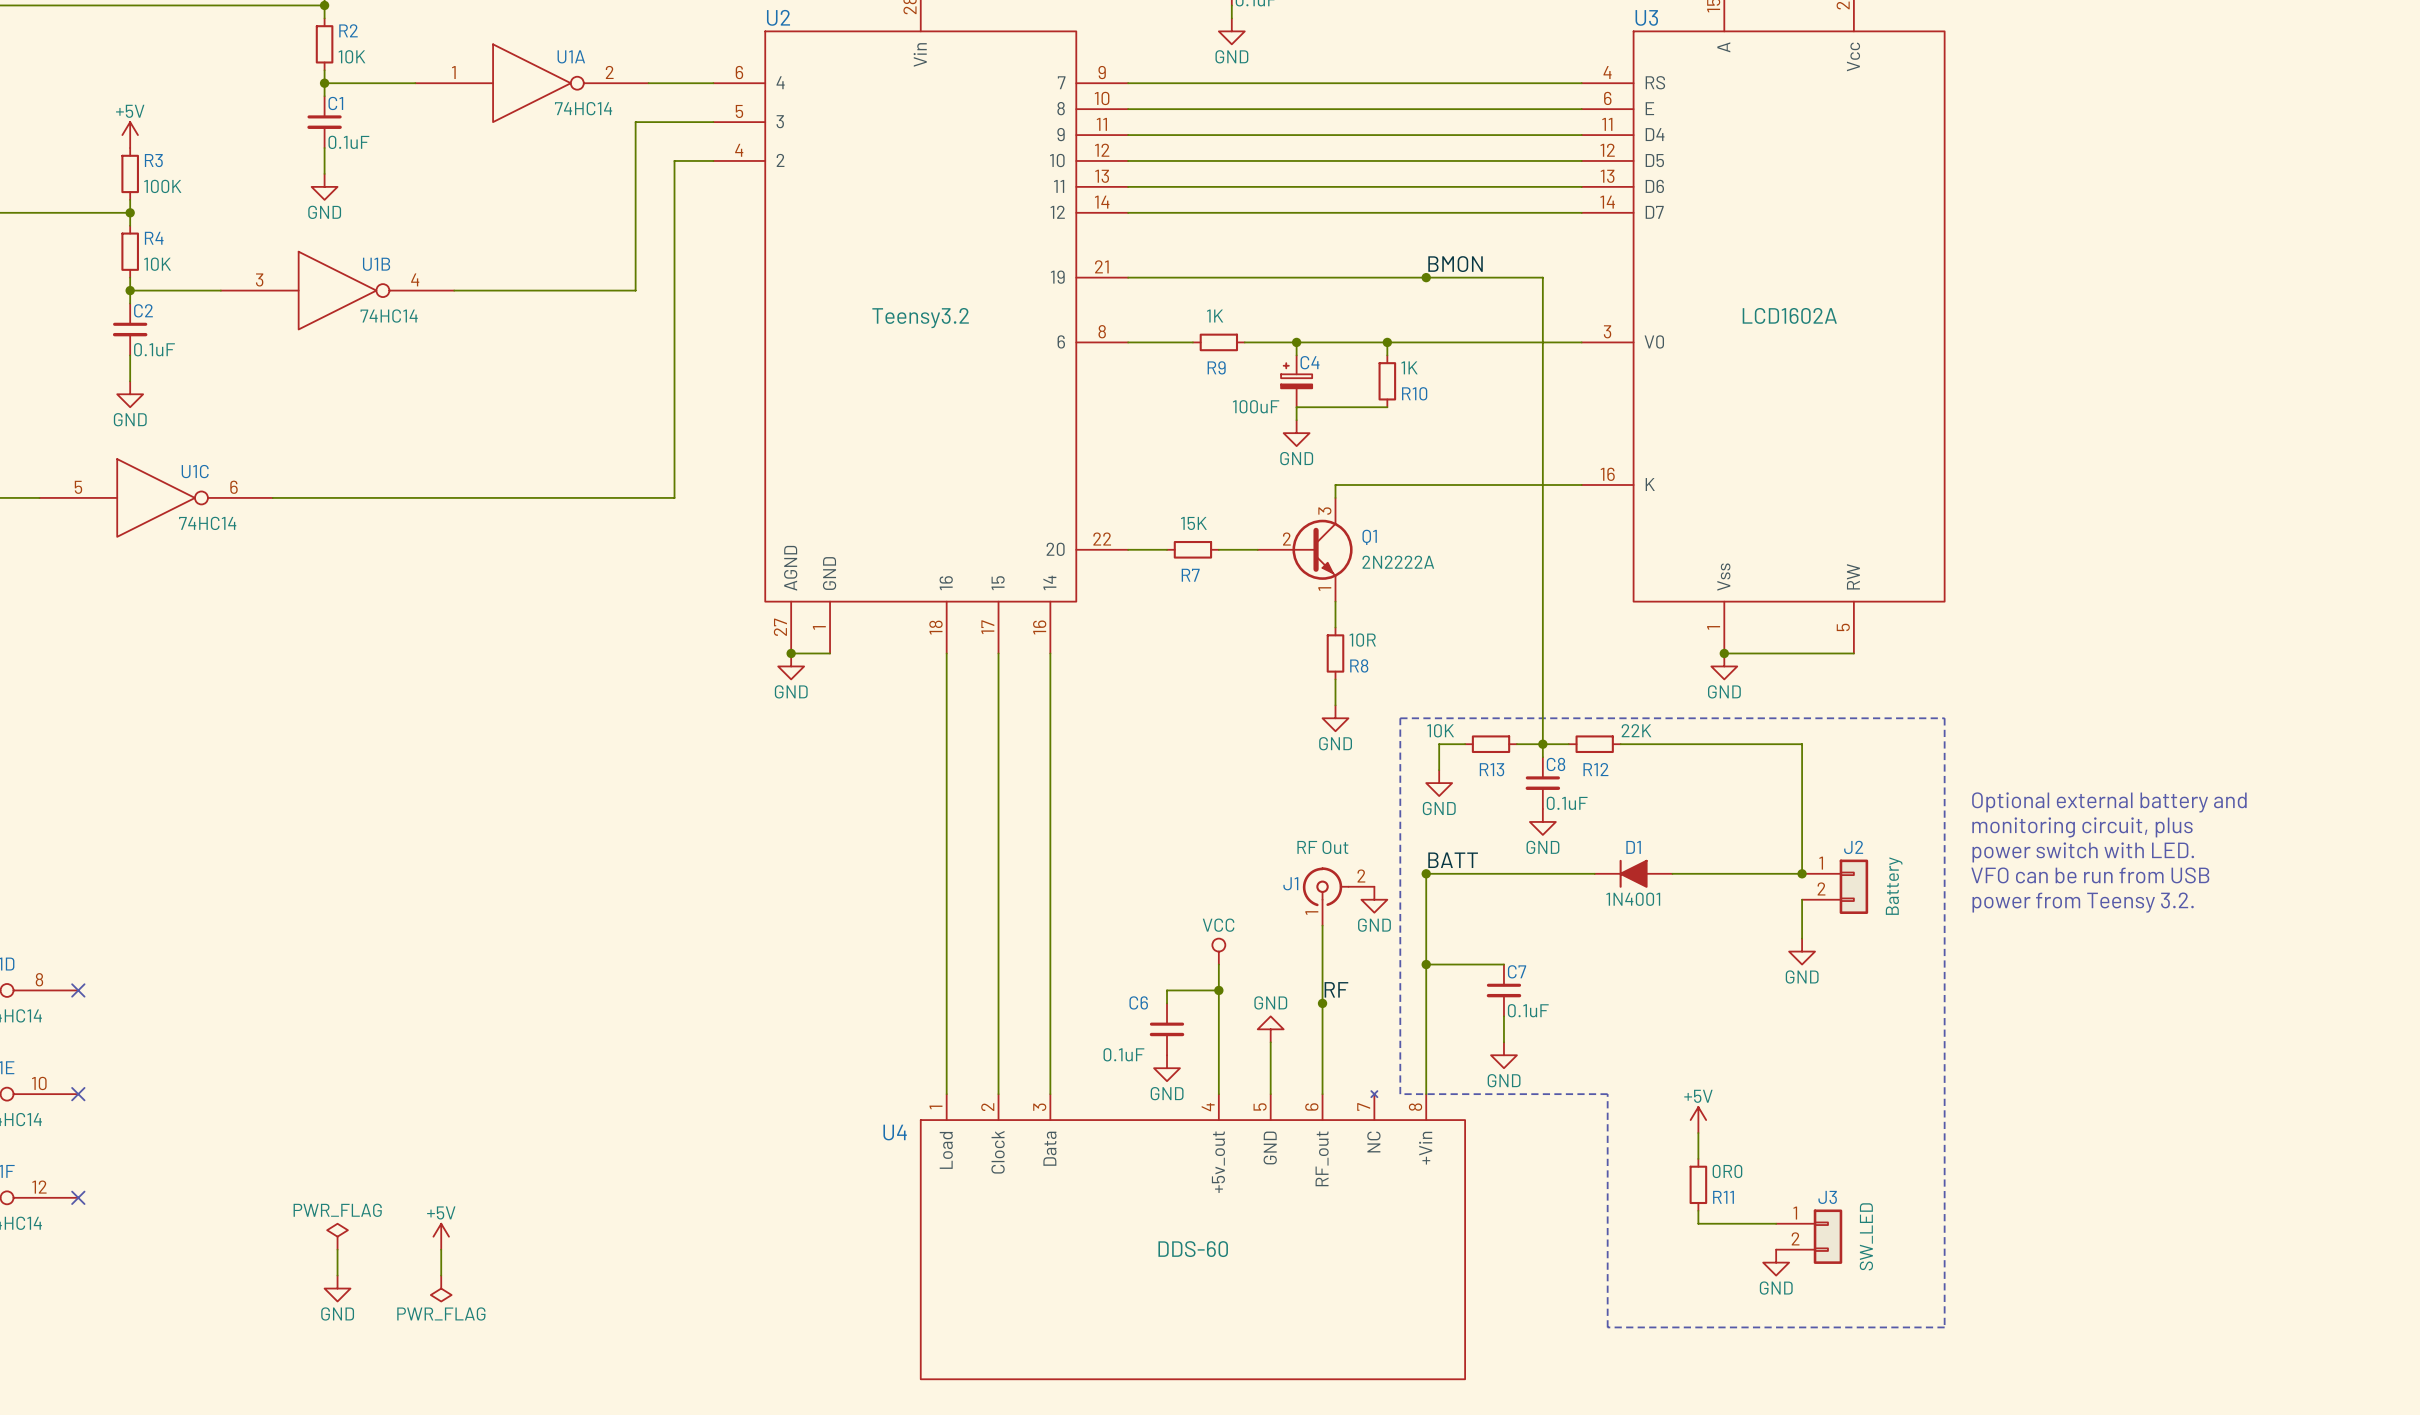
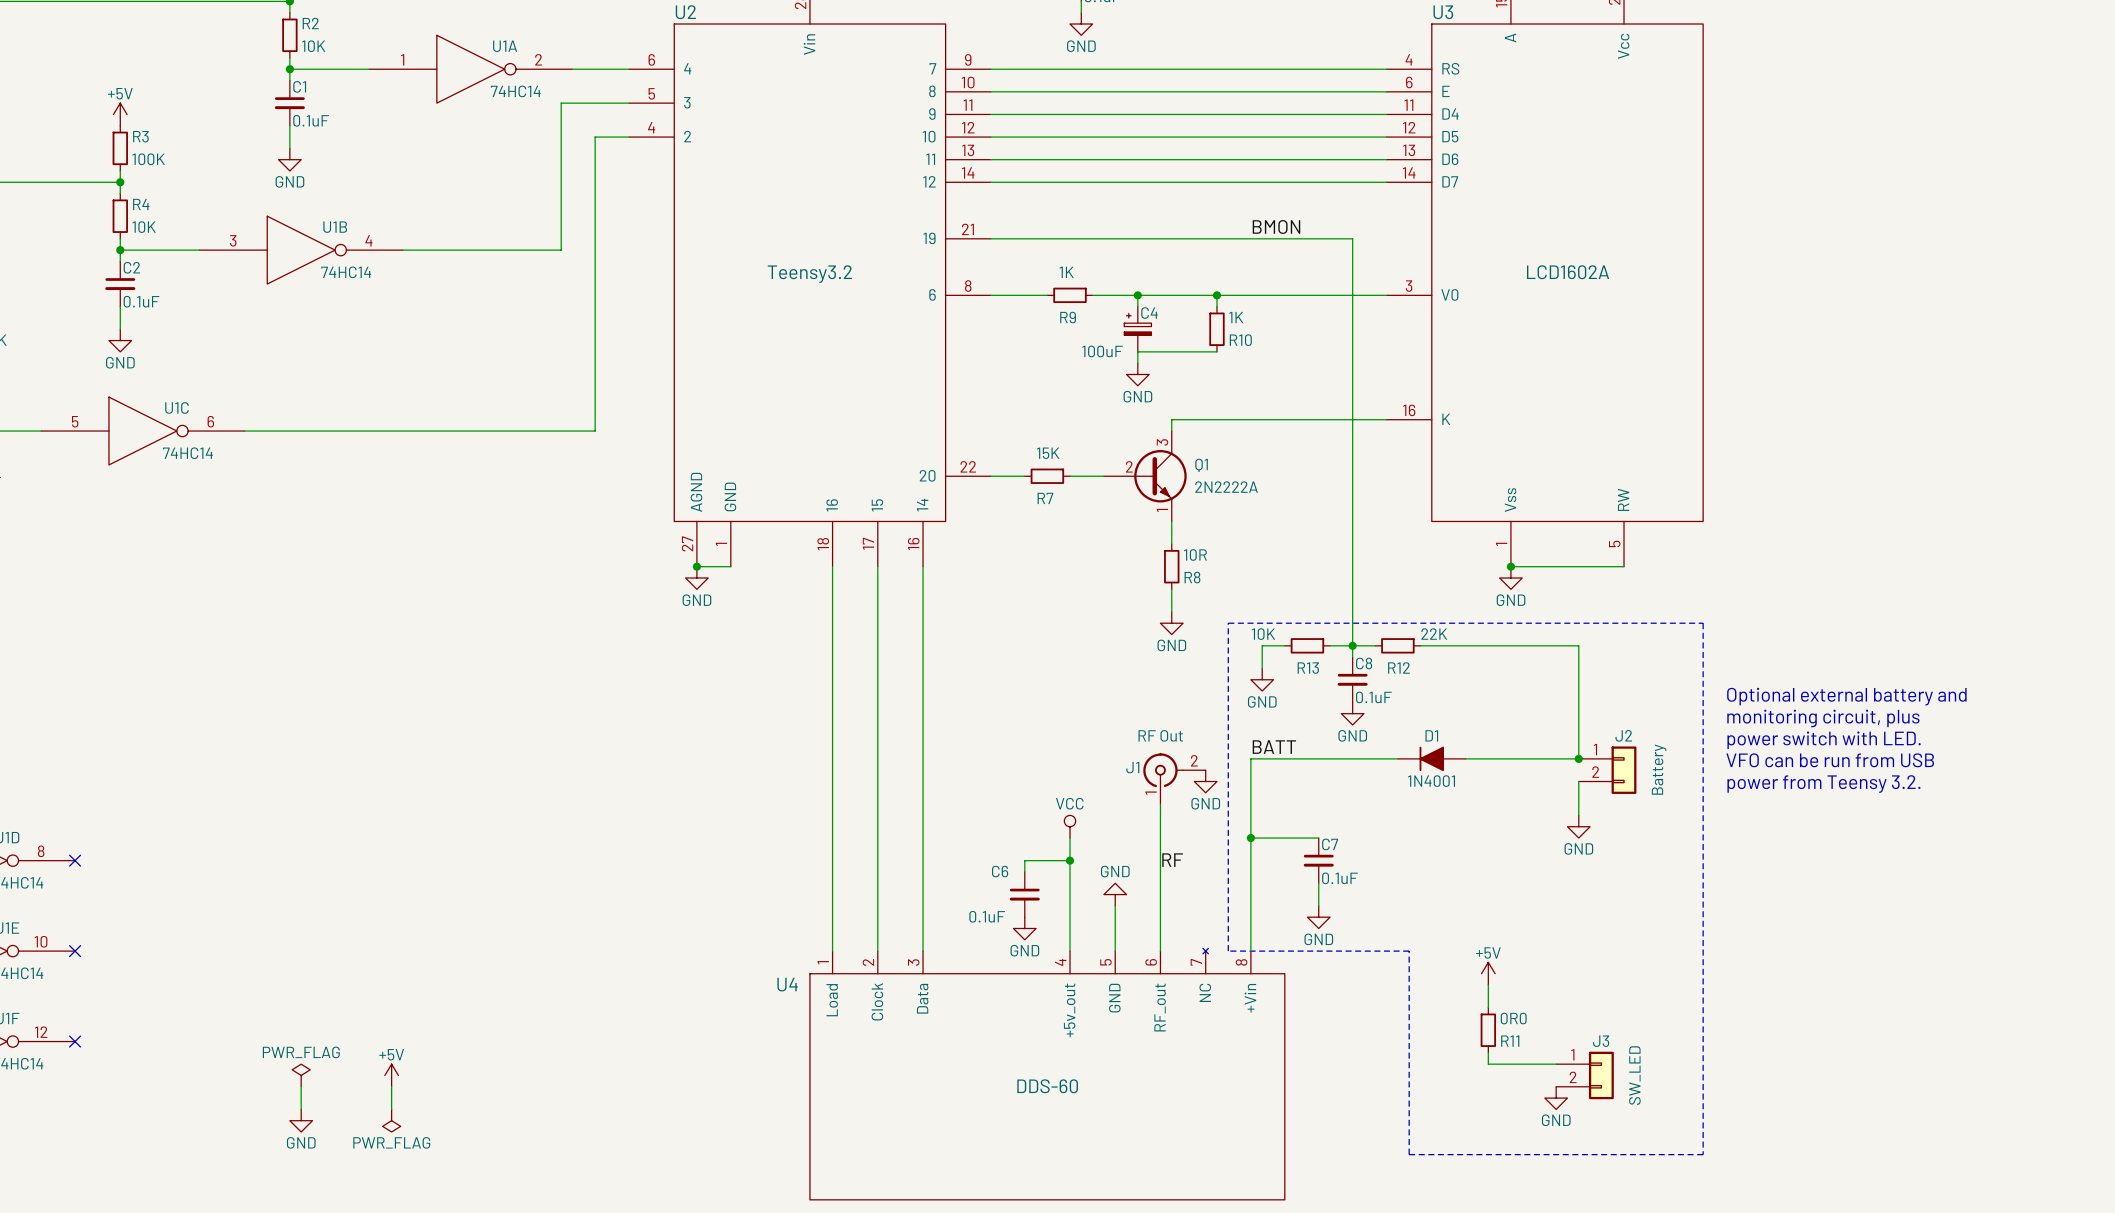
junction: (1426, 277) -> none
junction: (1426, 873) -> none
junction: (1322, 1003) -> none

